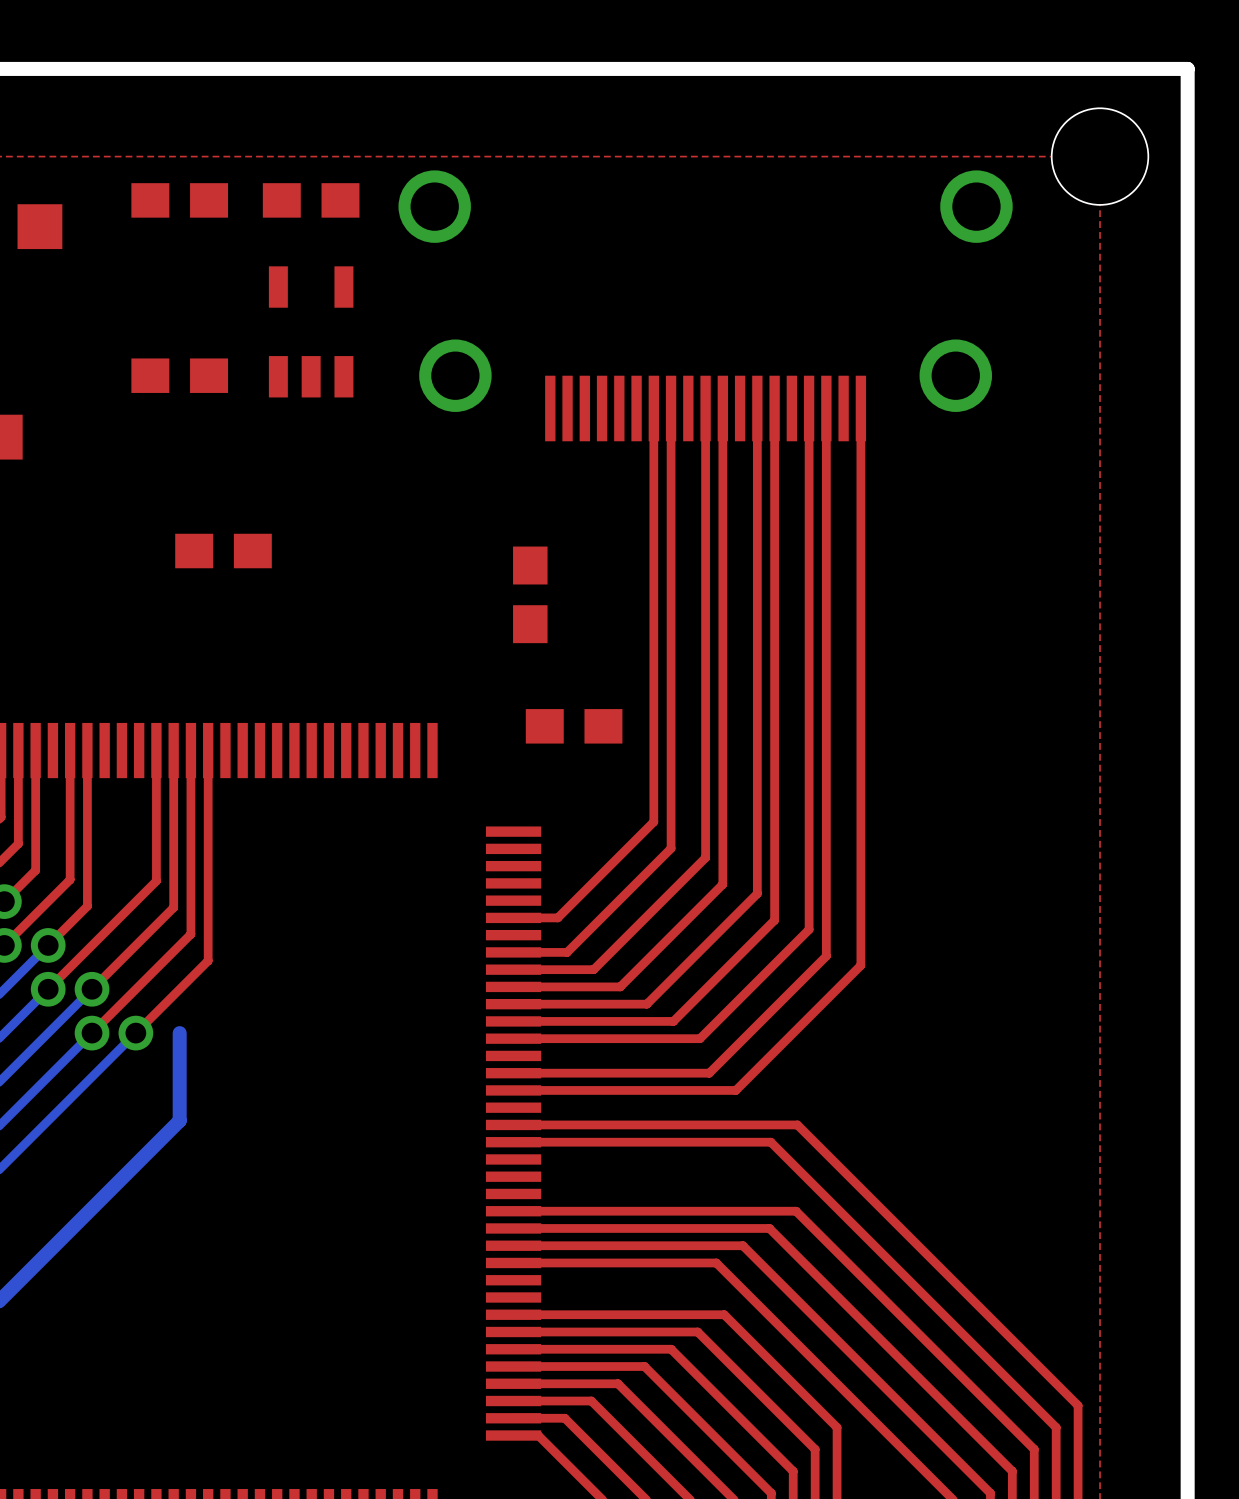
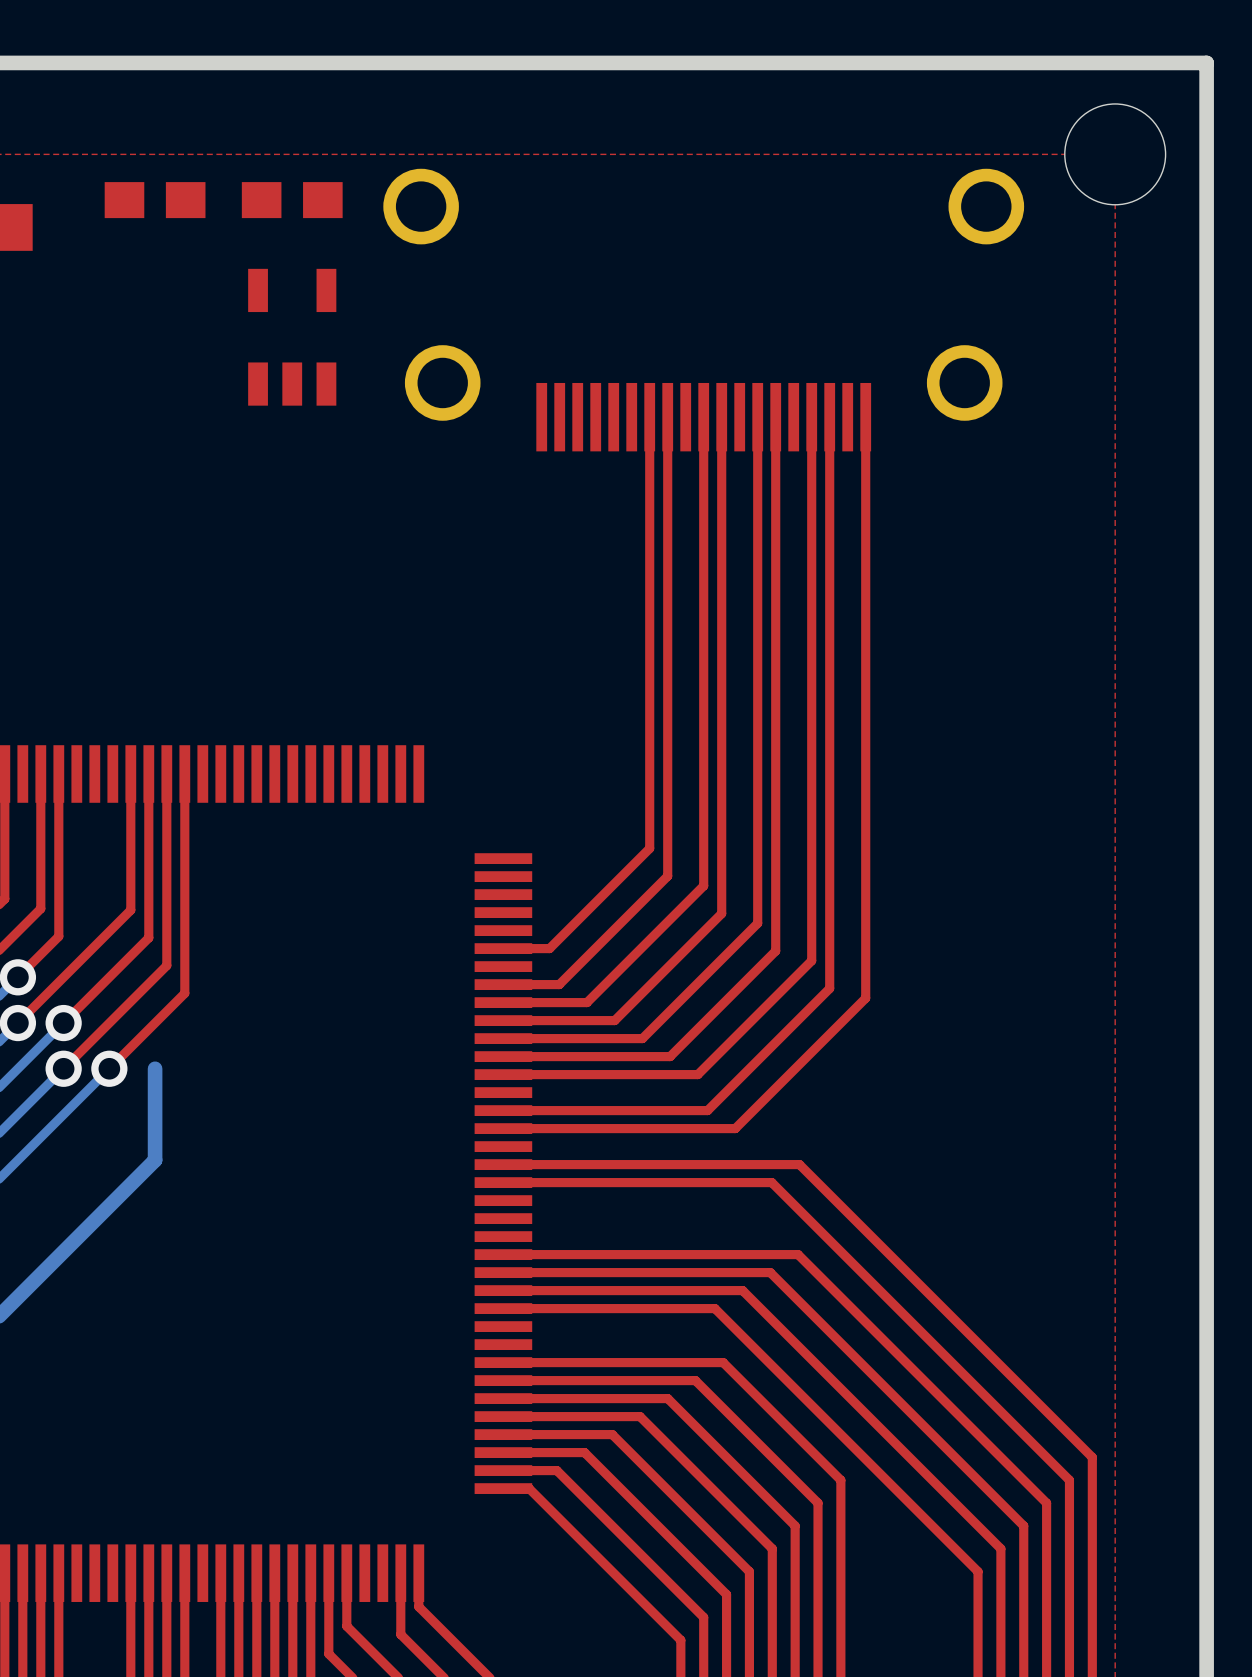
part: (179, 375) -> none
part: (223, 551) -> none
part: (530, 594) -> none
part: (574, 726) -> none

